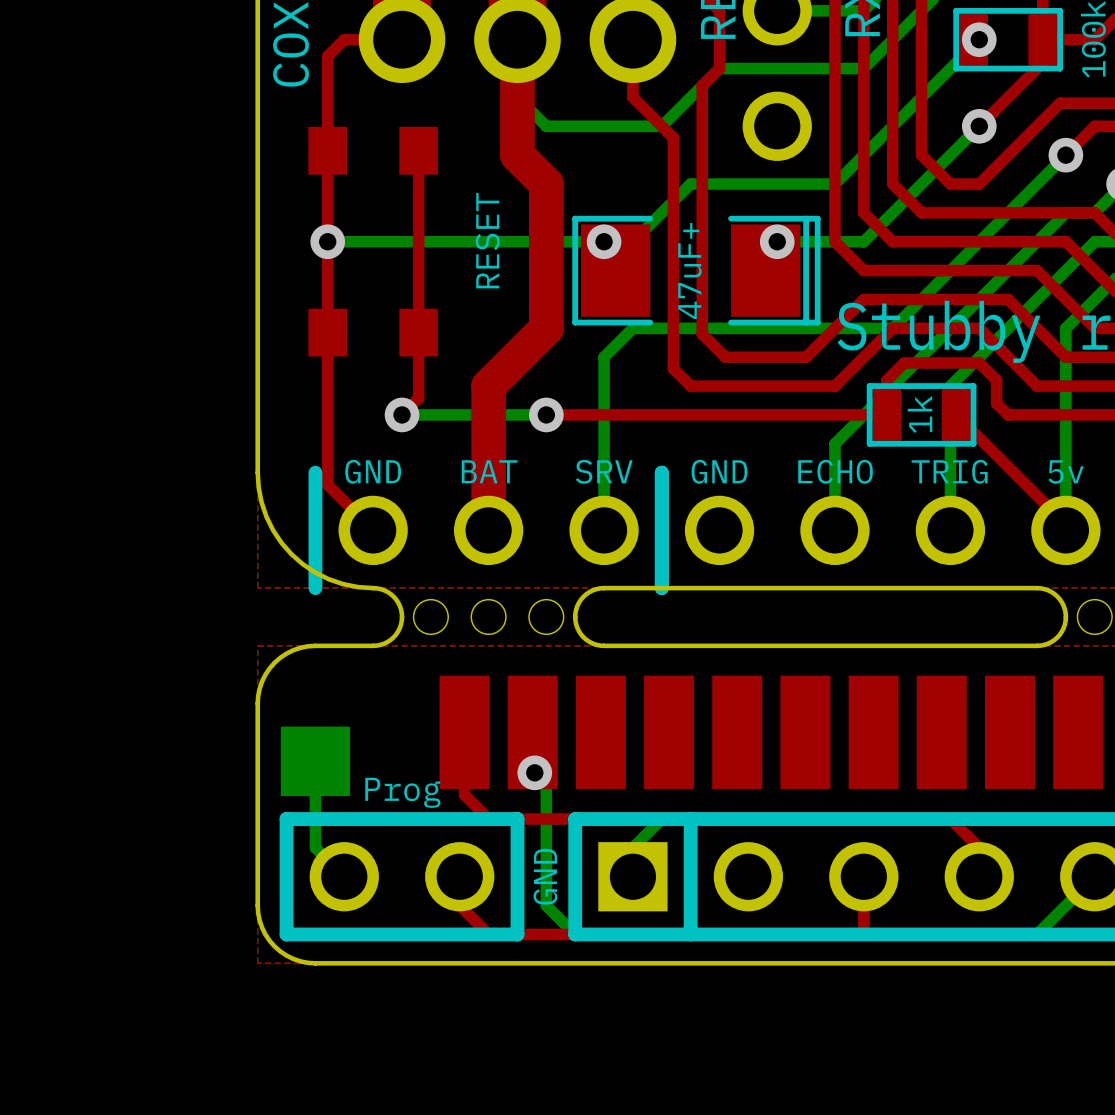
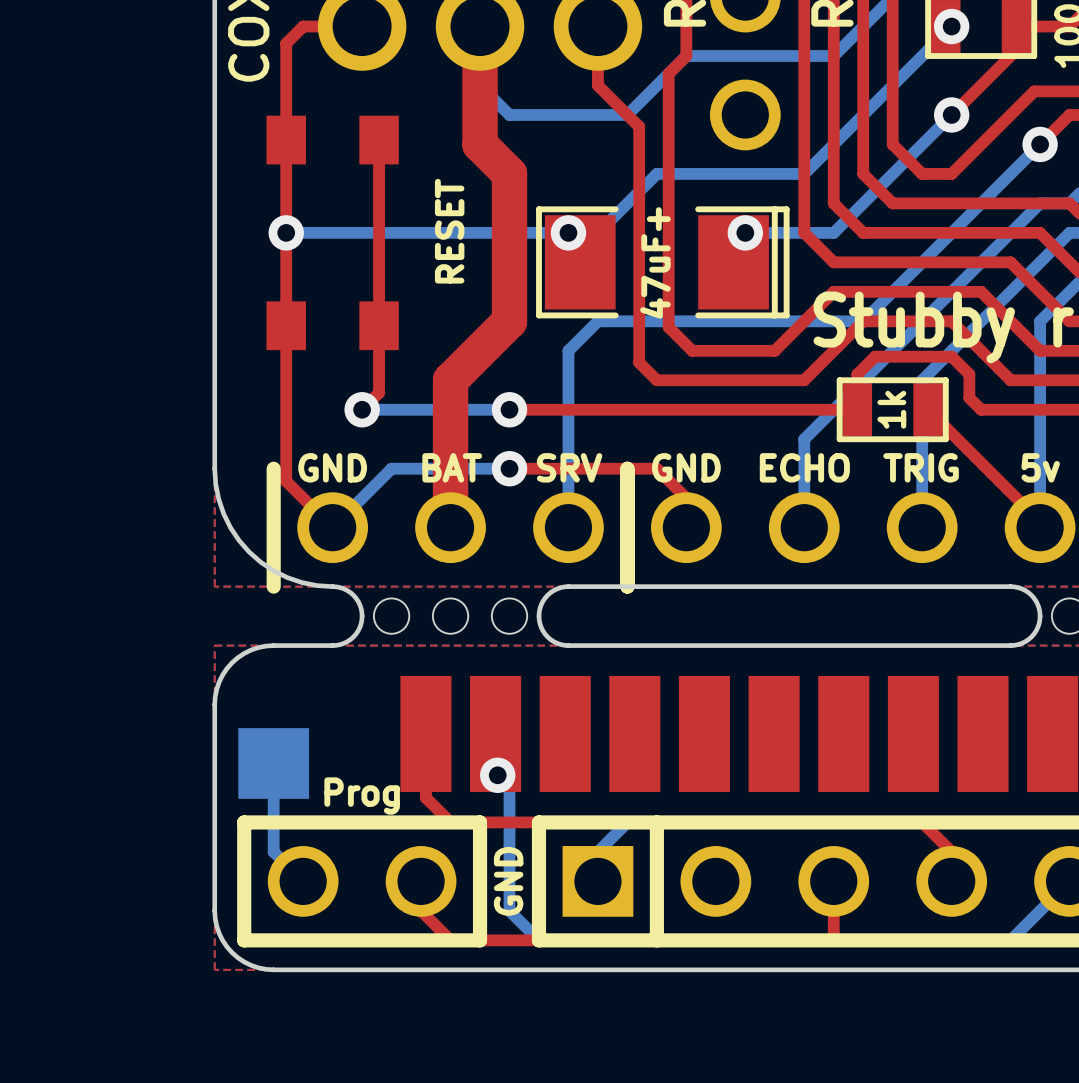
top track: none -> (509, 468) (656, 468) (686, 498) (686, 527)
bottom track: none -> (509, 468) (391, 468) (332, 527)
via: none -> (509, 468)

